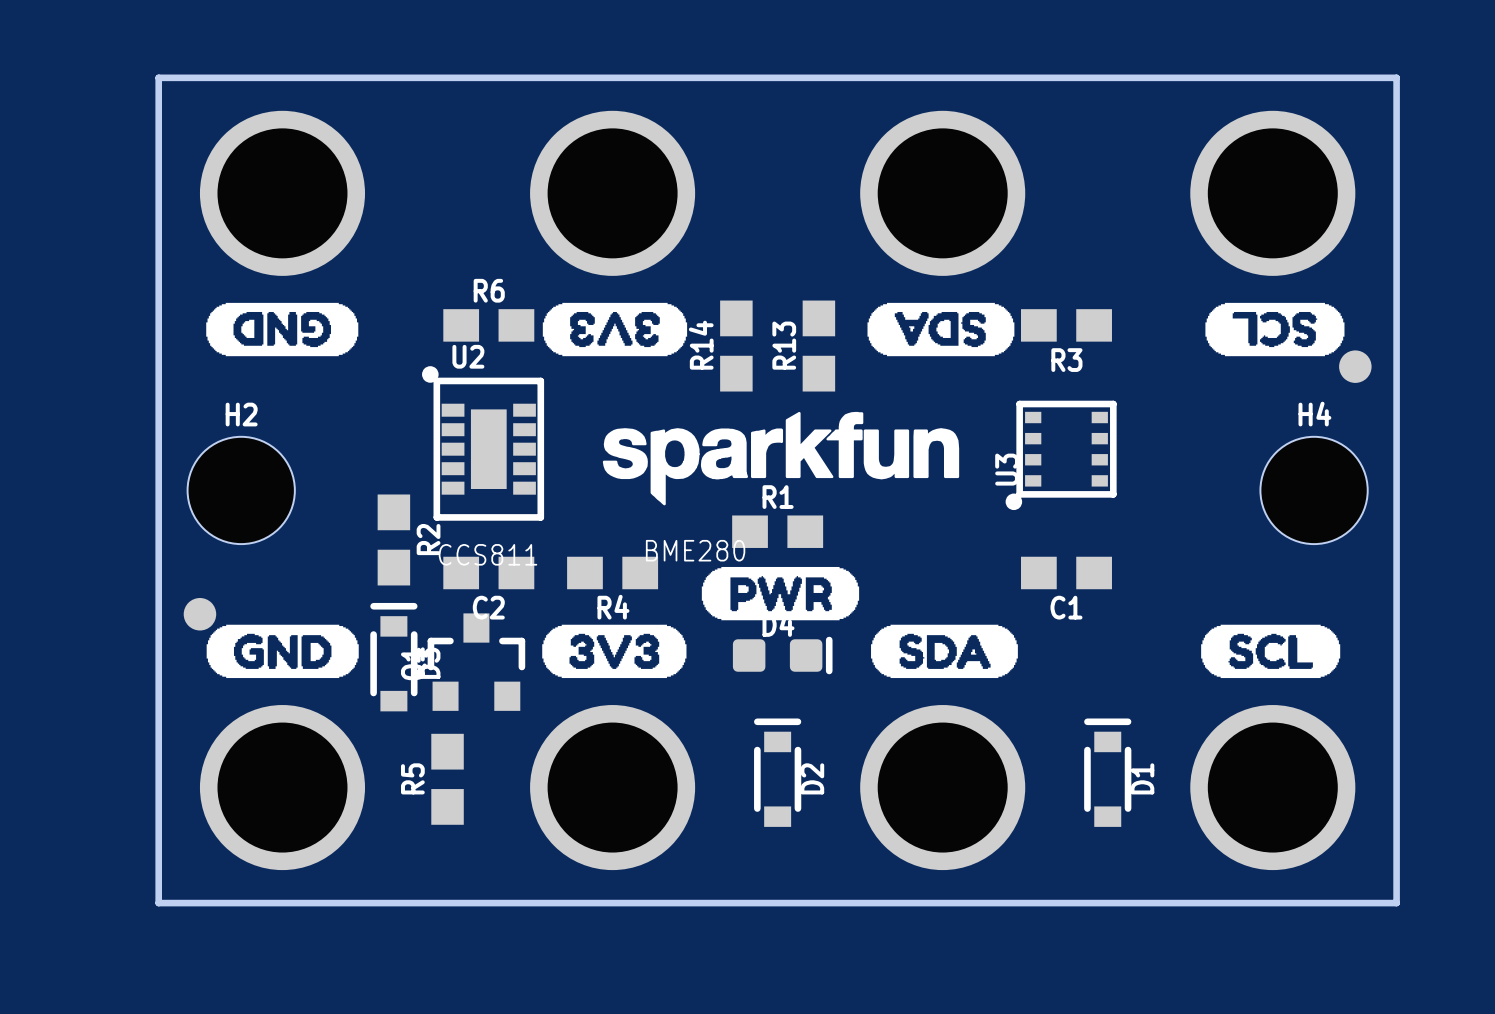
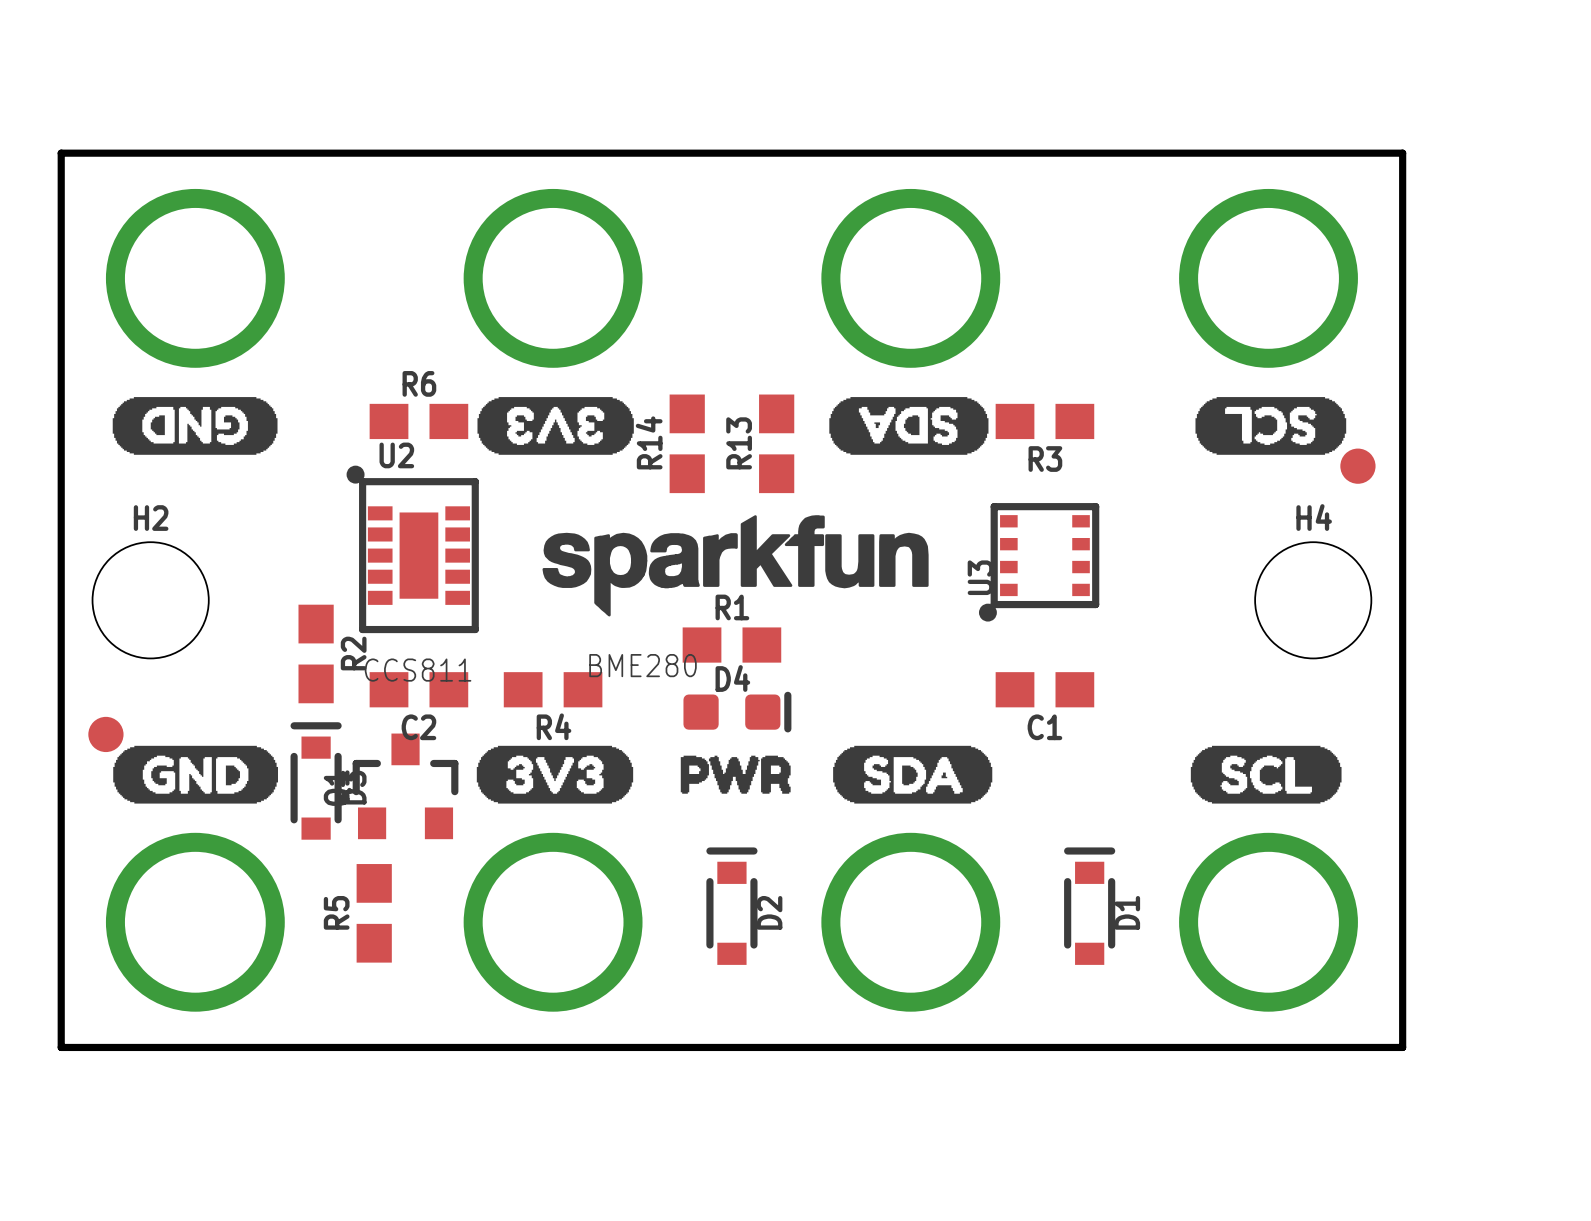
drawing: [701, 566, 860, 621] -> none
drawing: none -> [680, 755, 791, 794]
D4 position: (782, 655) -> (737, 712)

